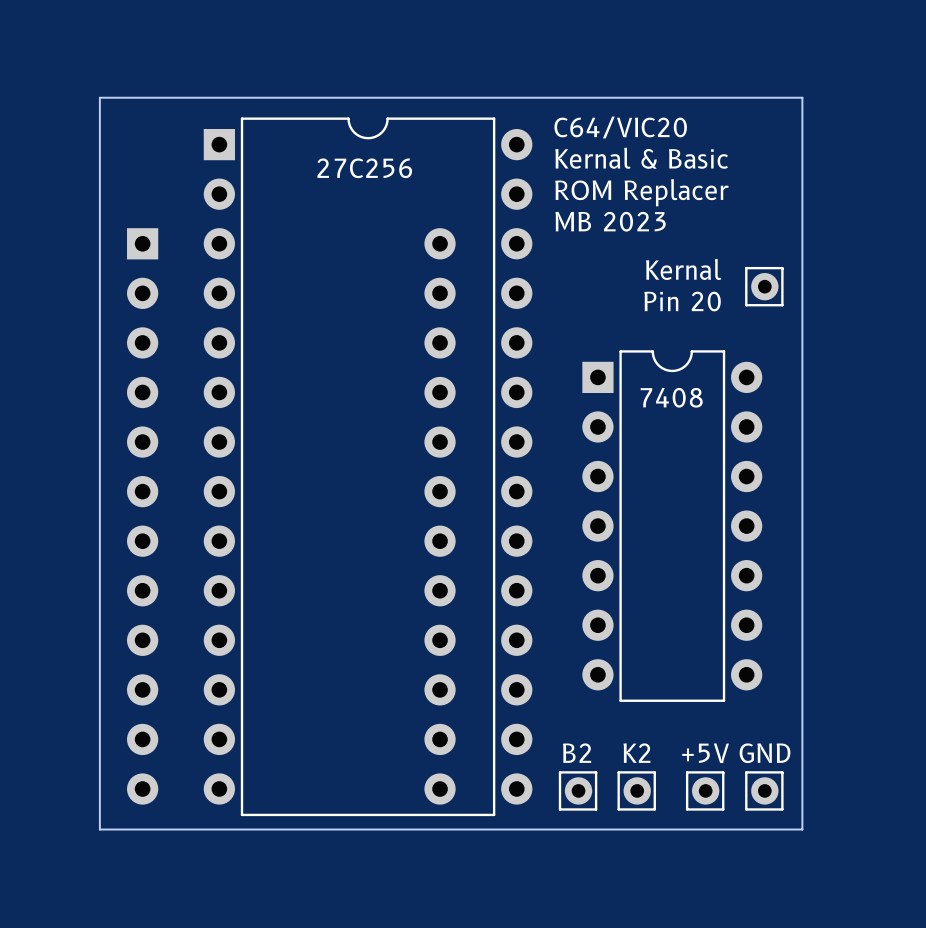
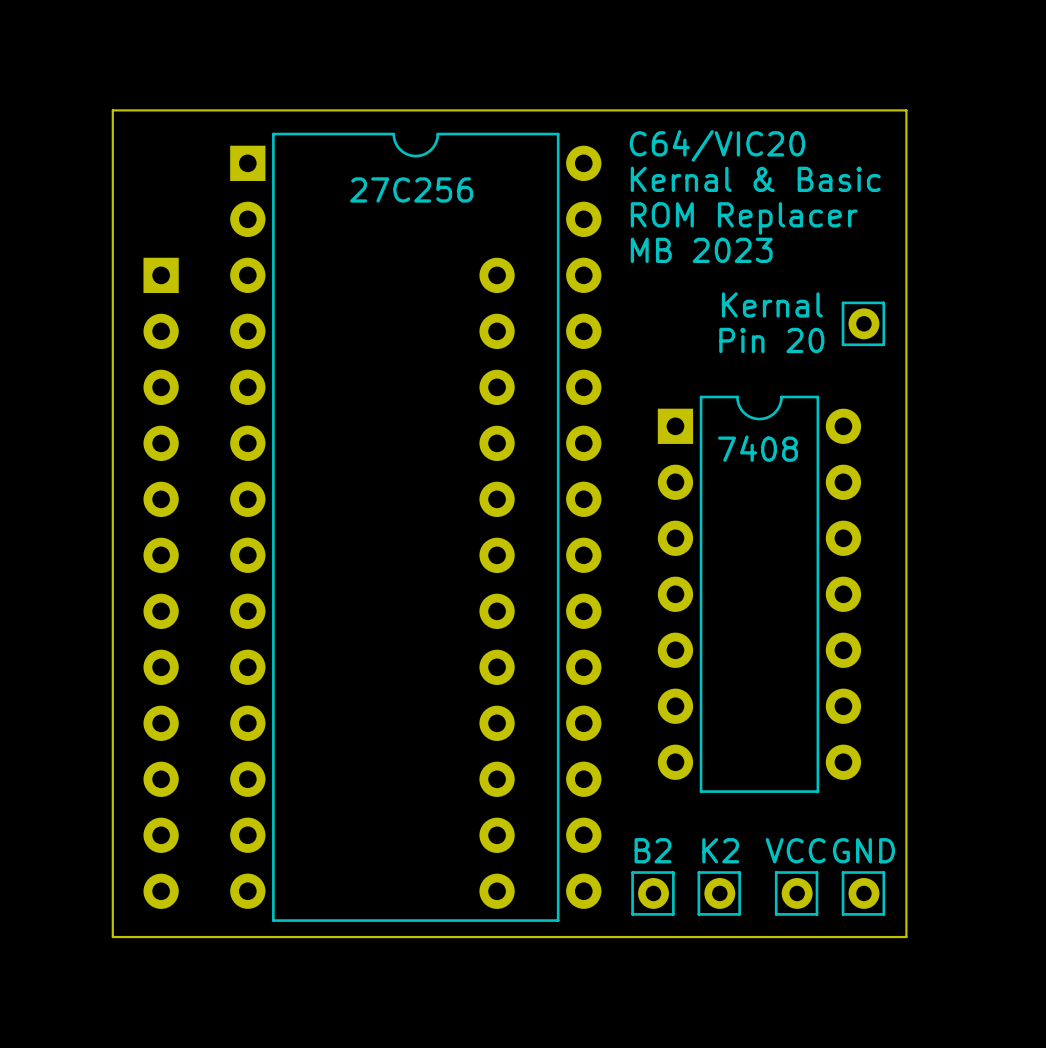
part value: +5V (705, 753) -> VCC (795, 850)

